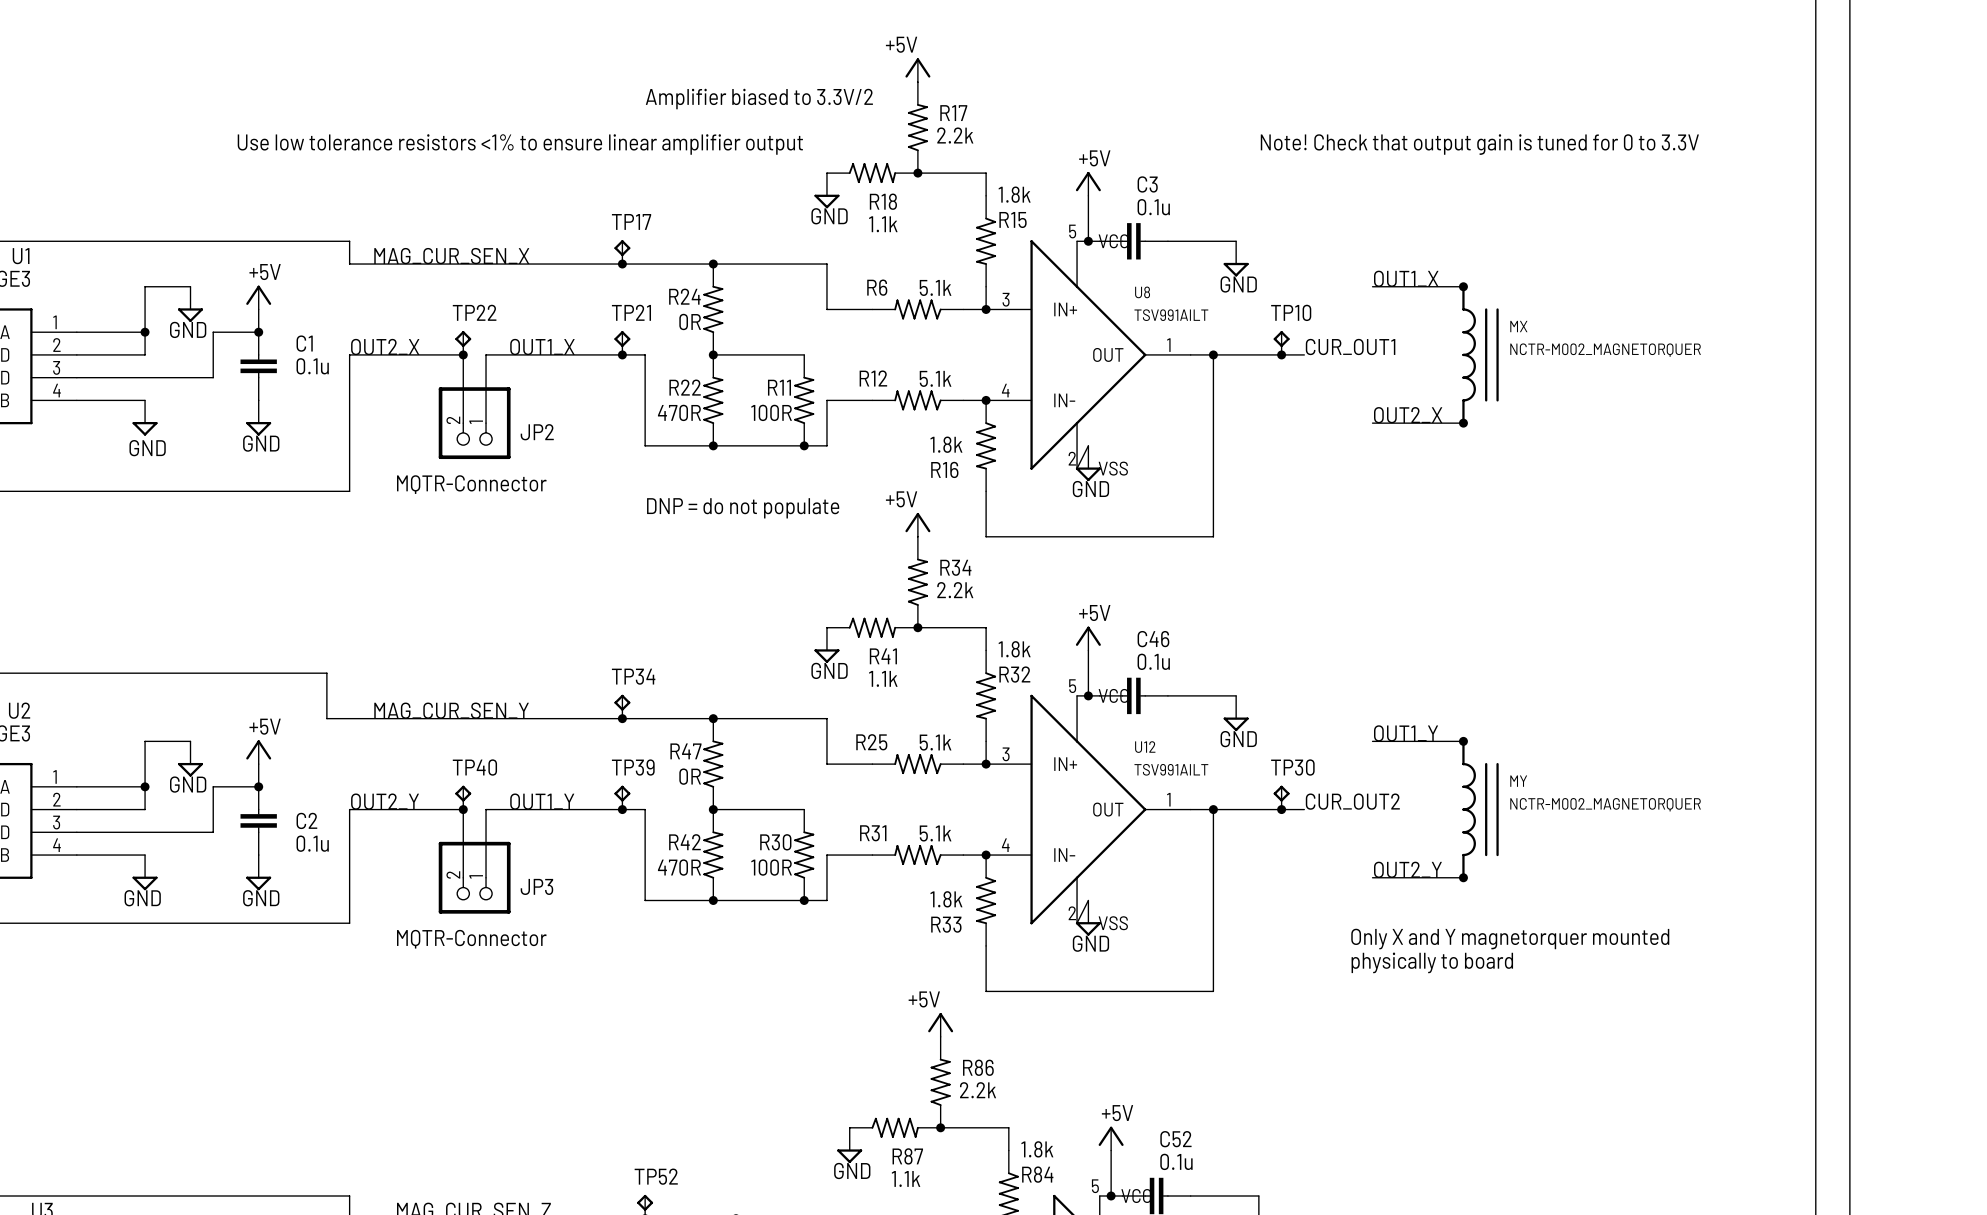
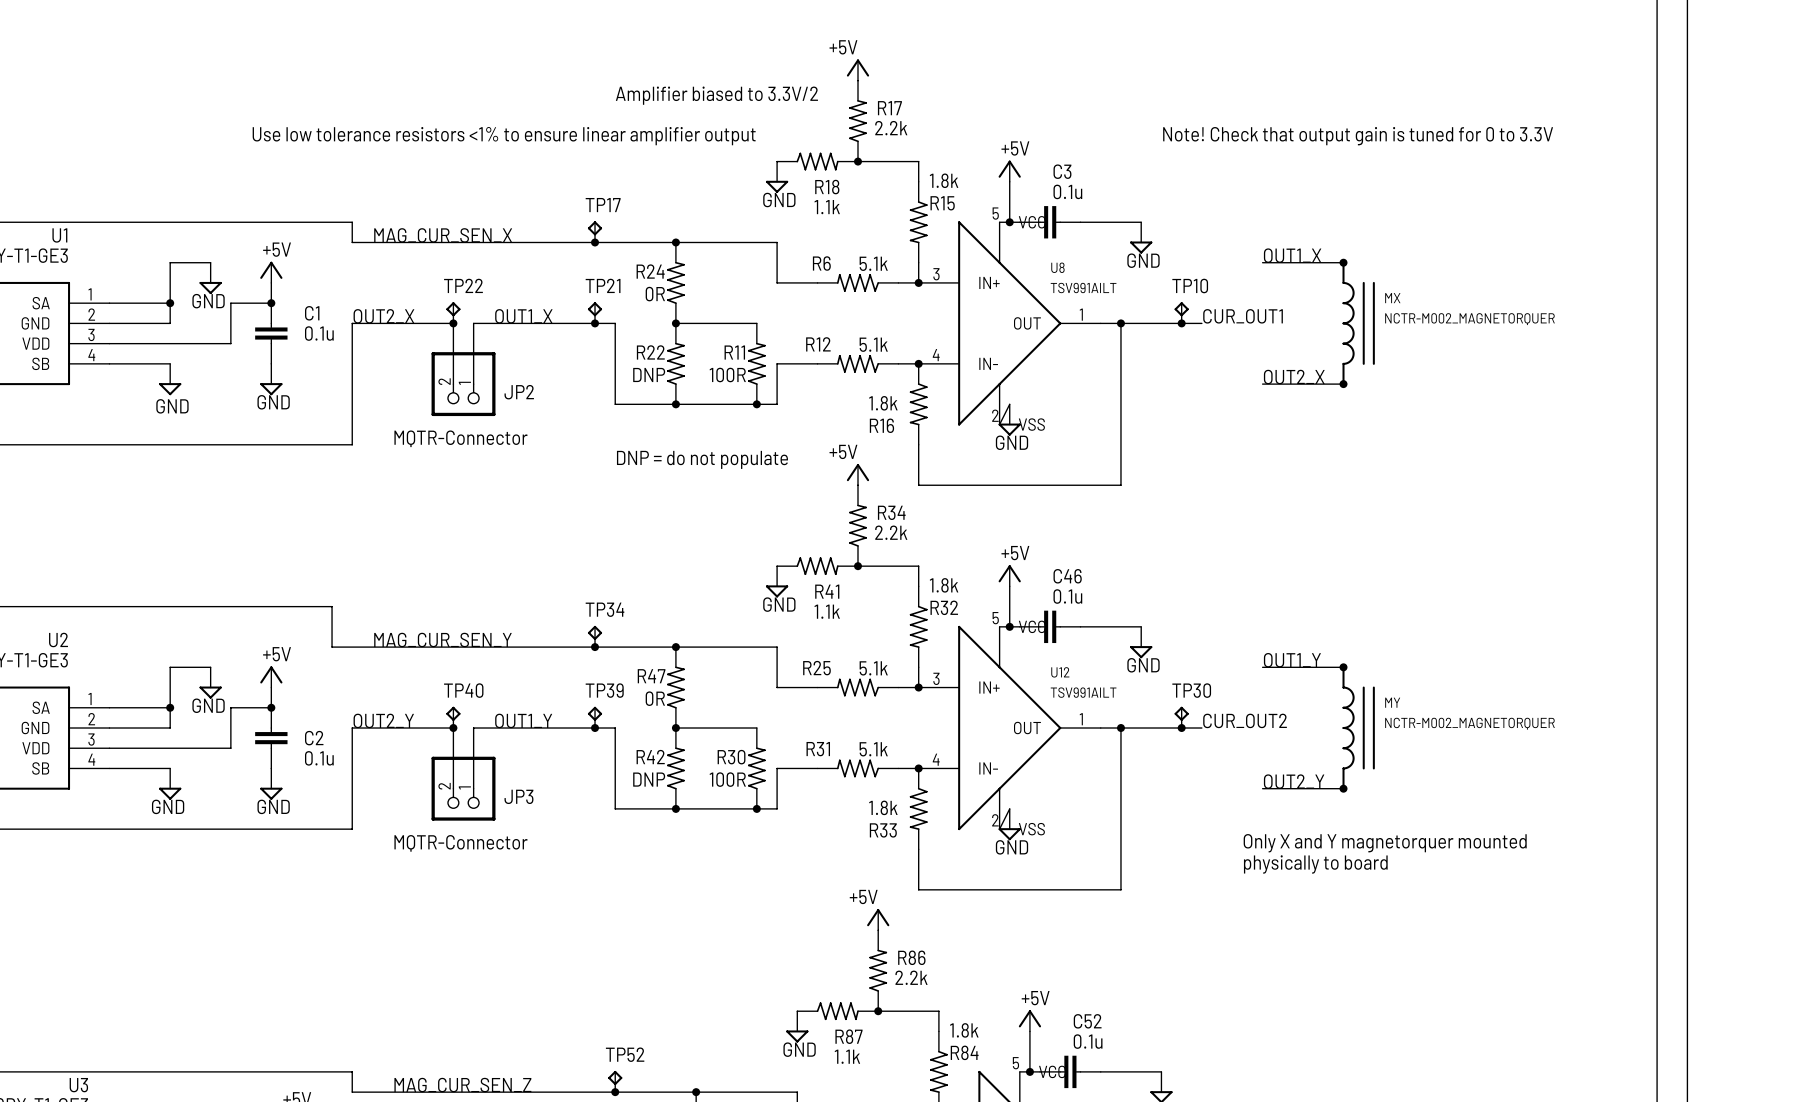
R22 value: 470R (679, 412) -> DNP (649, 374)
R42 value: 470R (679, 867) -> DNP (649, 779)

